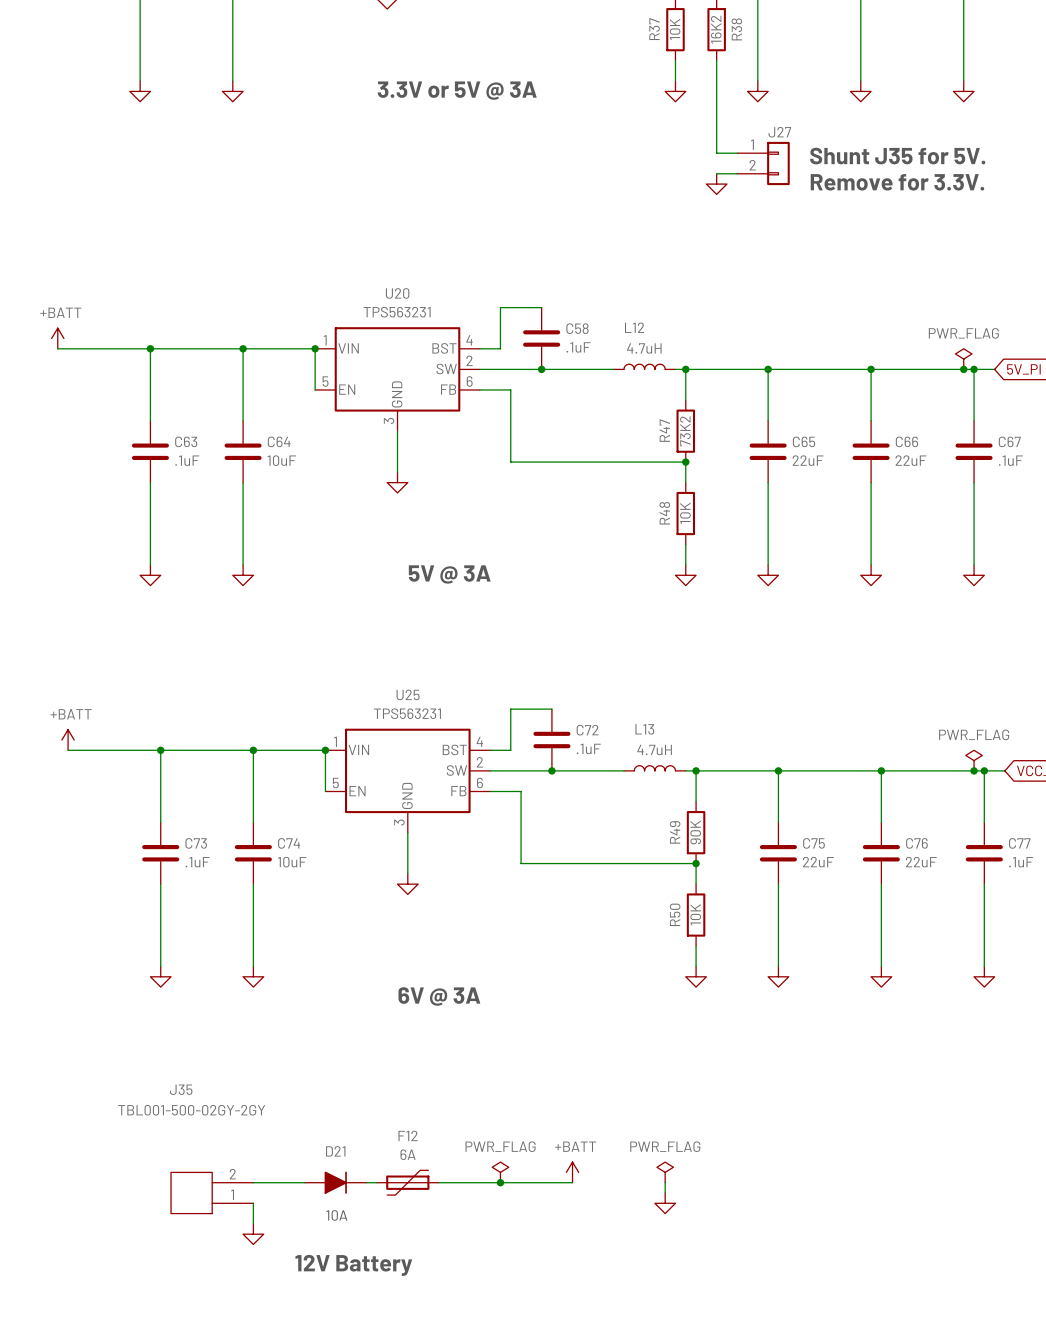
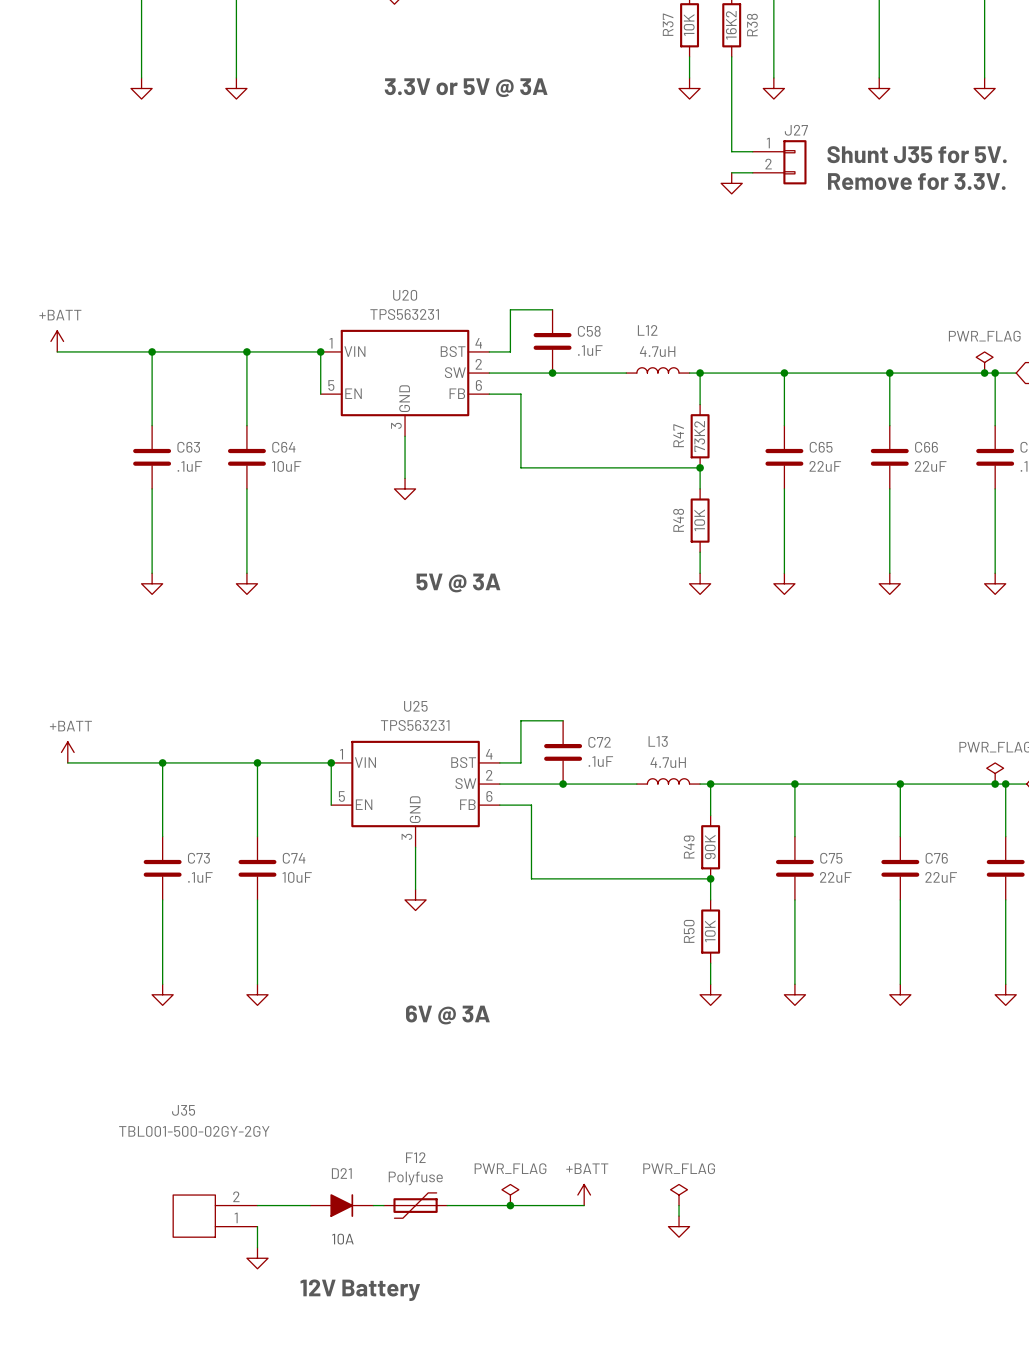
F12 value: 6A (408, 1154) -> Polyfuse (415, 1178)

